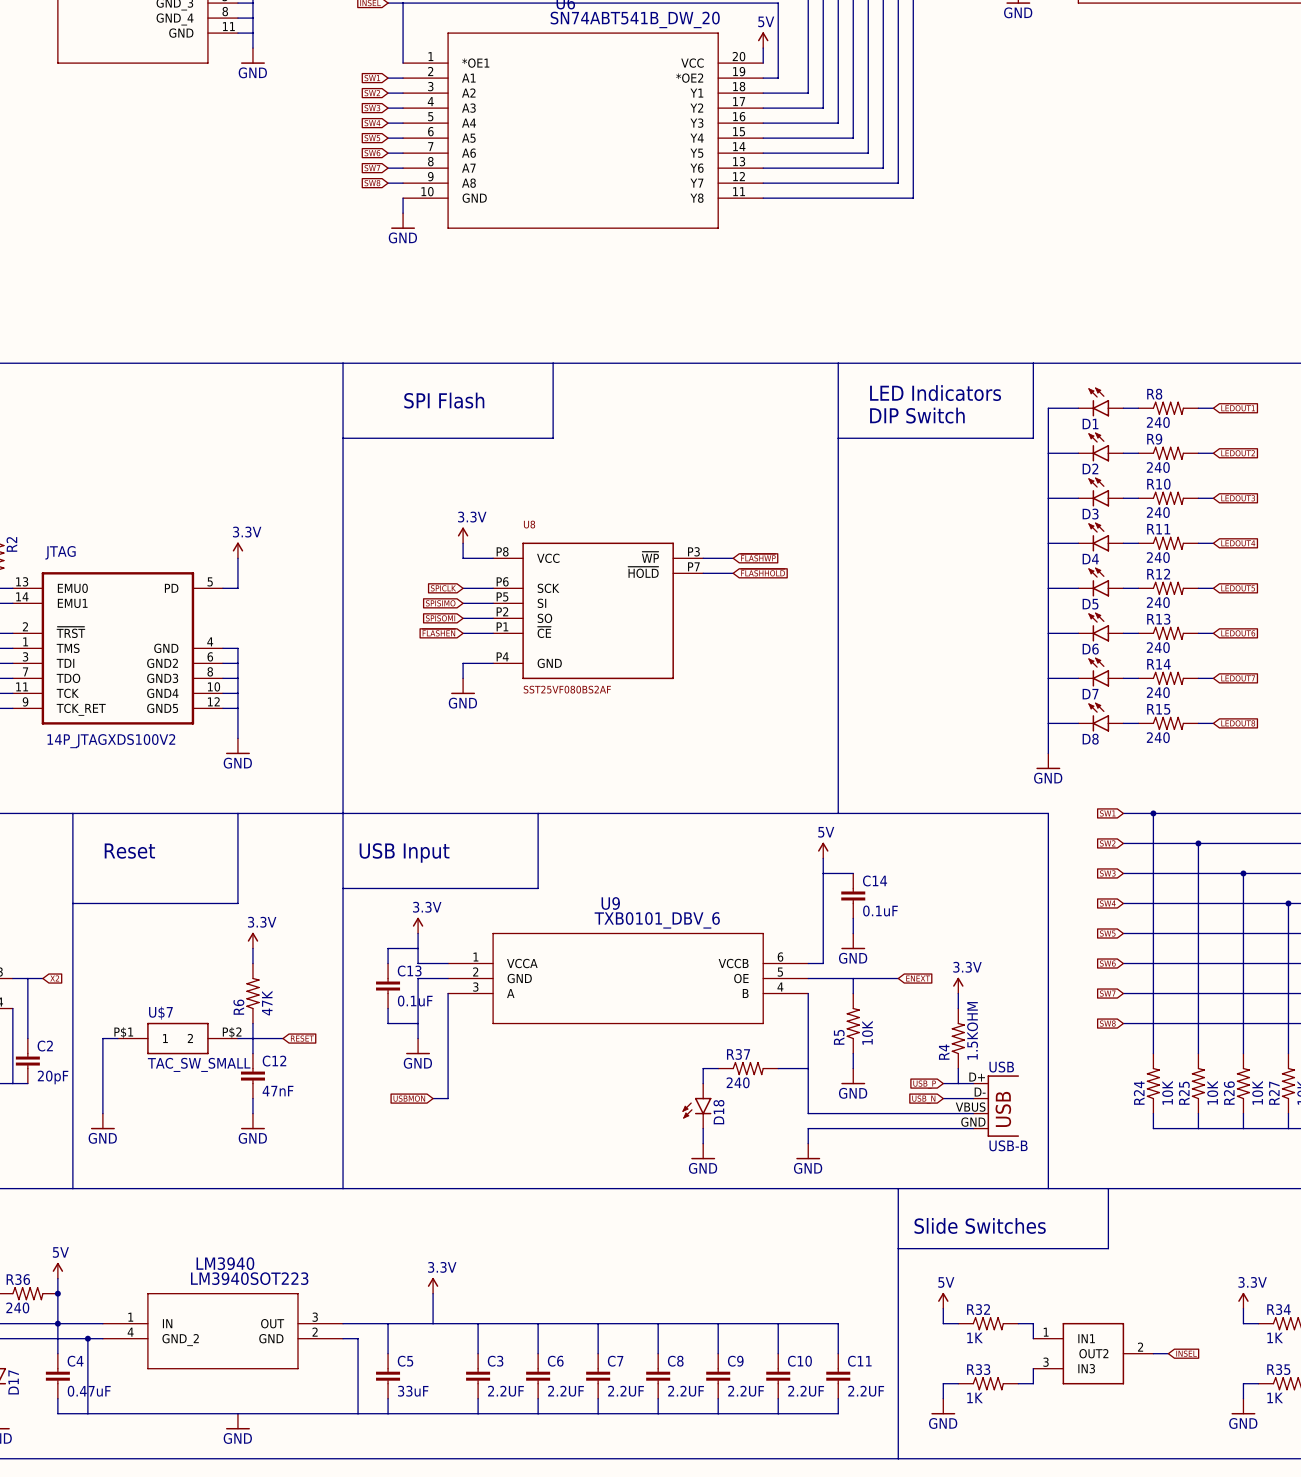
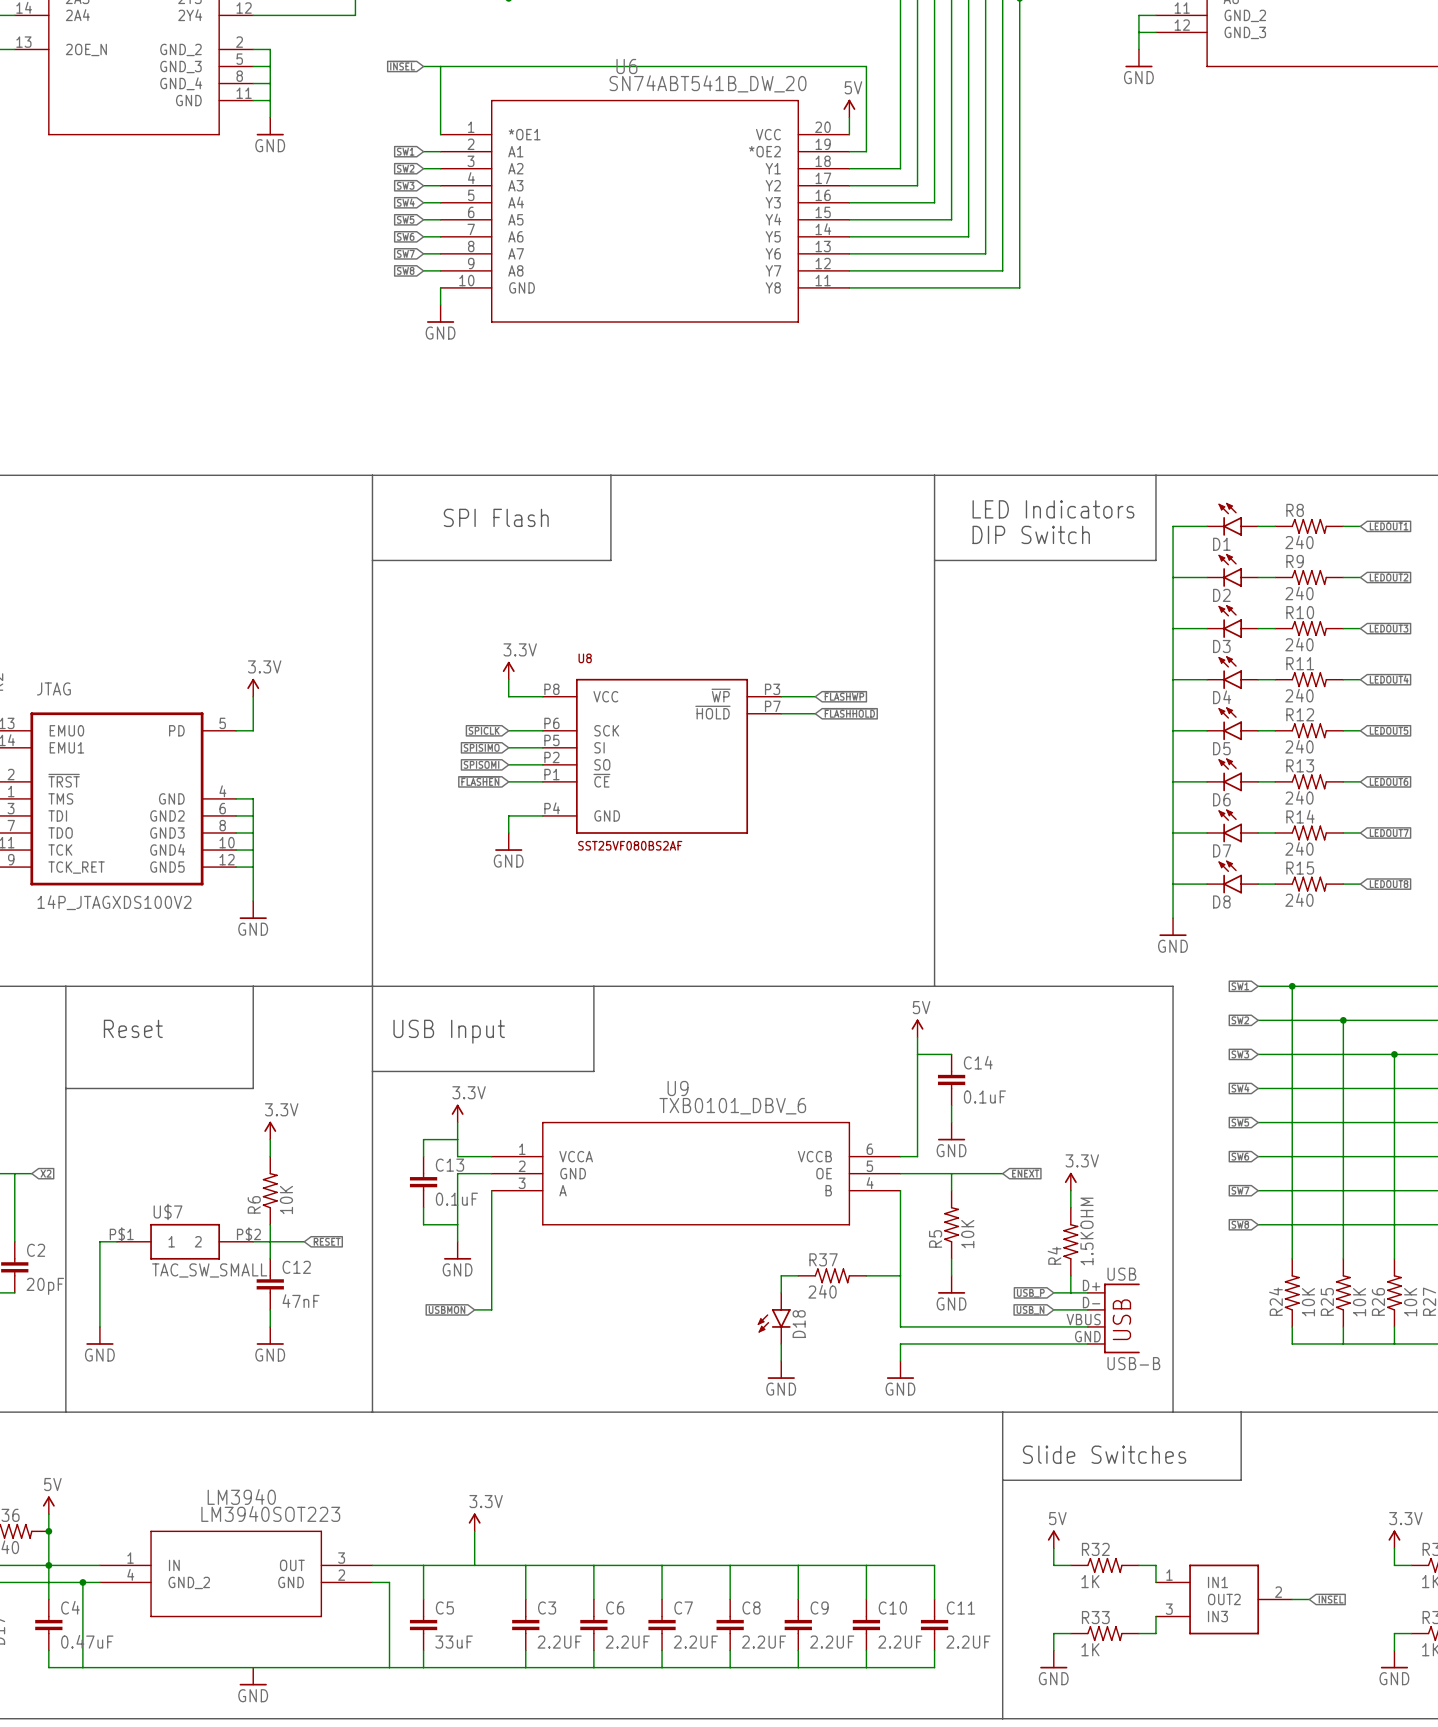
R6 value: 47K (267, 1003) -> 10K (286, 1200)

